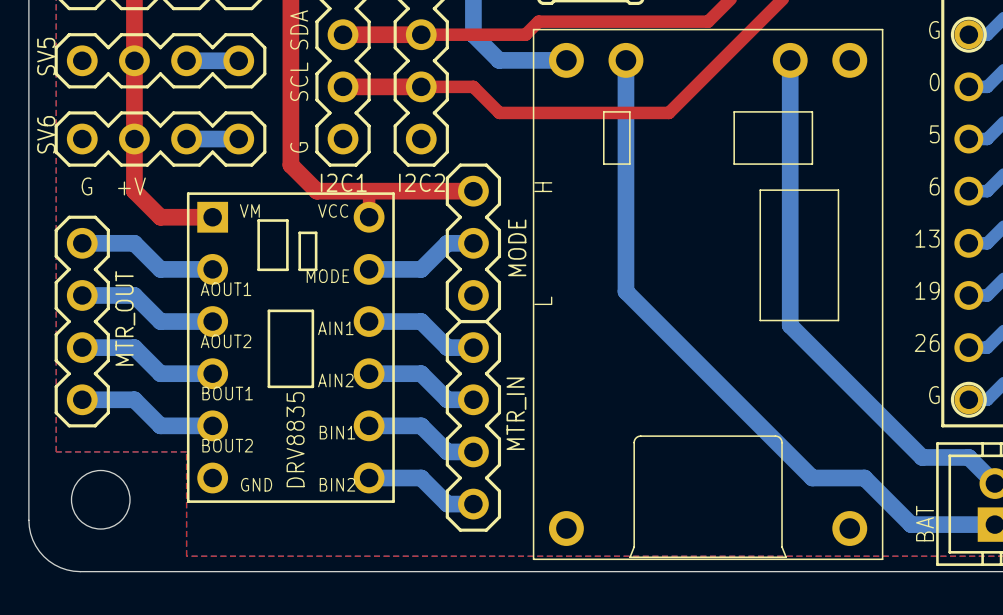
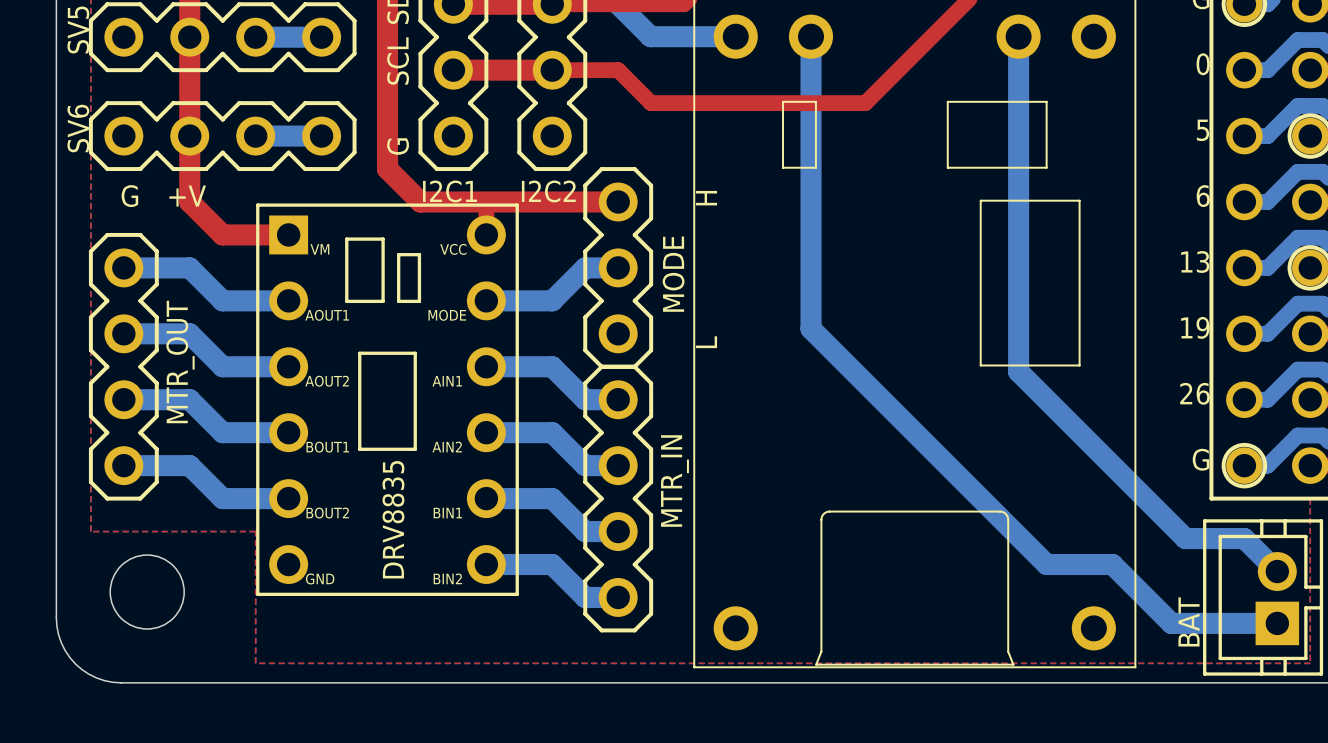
part footprint: [186, 192, 395, 503] -> [256, 203, 519, 597]

